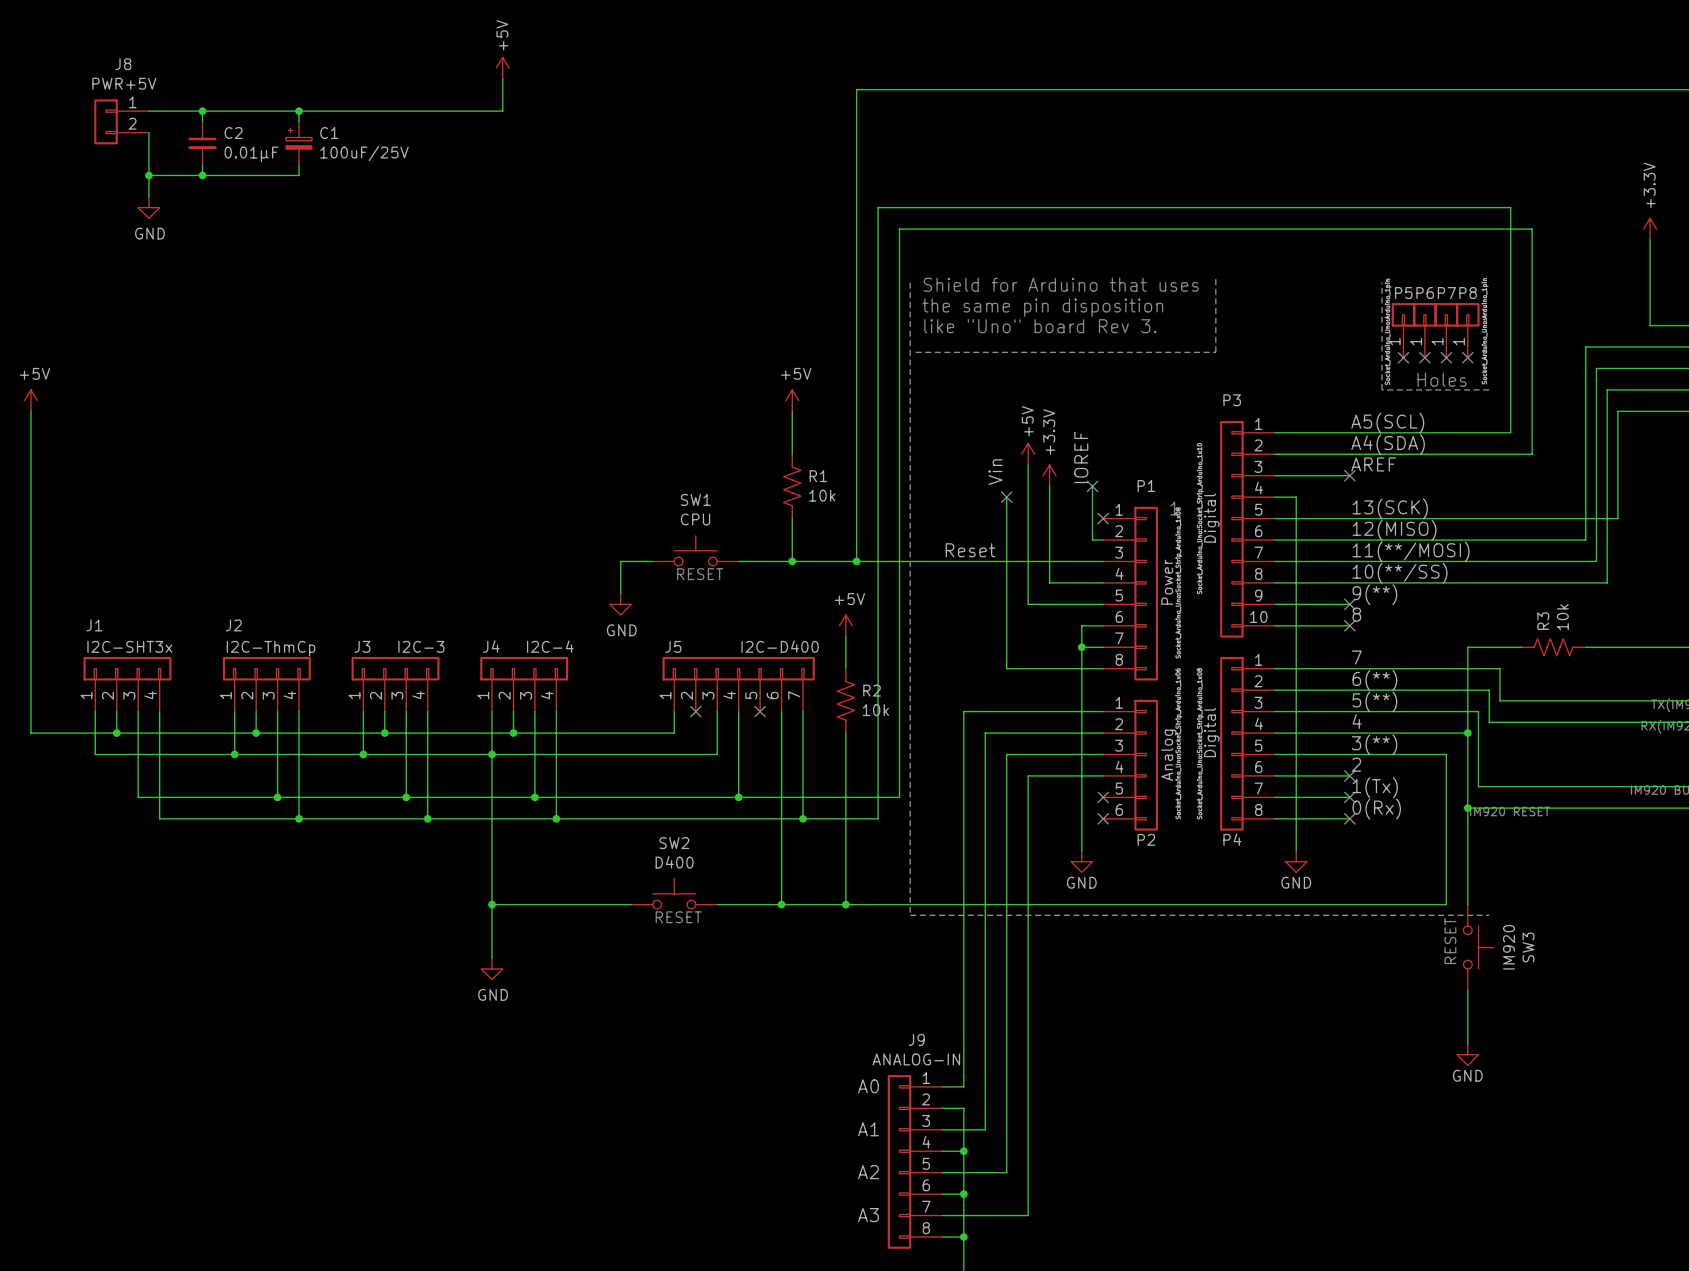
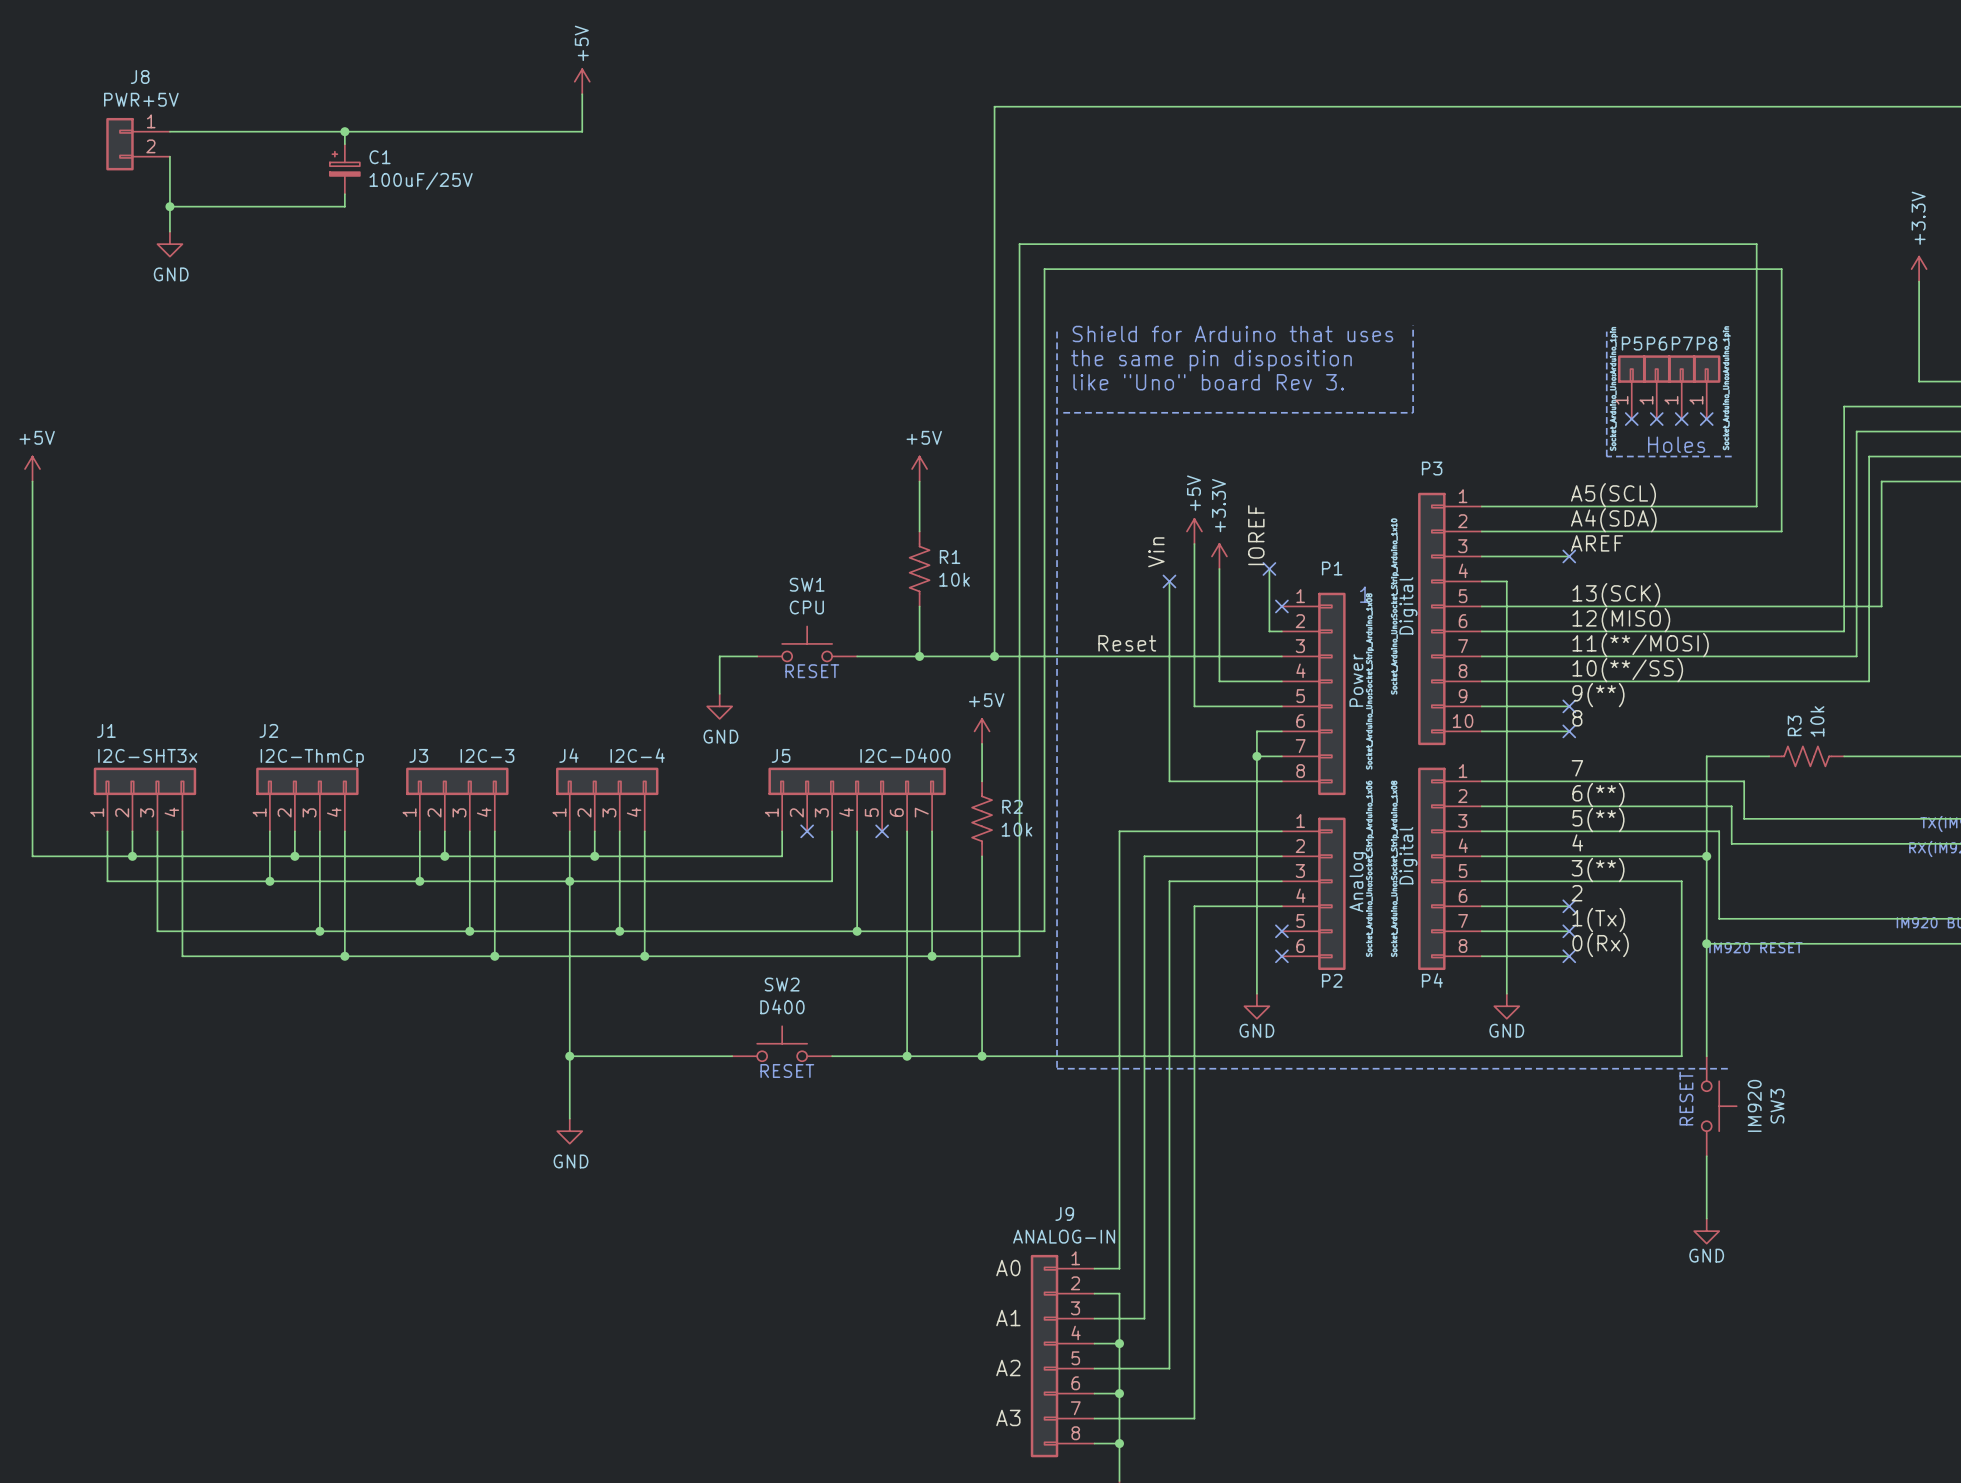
wire: (202, 111) (202, 121) -> none
junction: (202, 111) -> none
C2: 0.01μF (202, 143) -> none
wire: (202, 164) (202, 175) -> none
junction: (202, 175) -> none

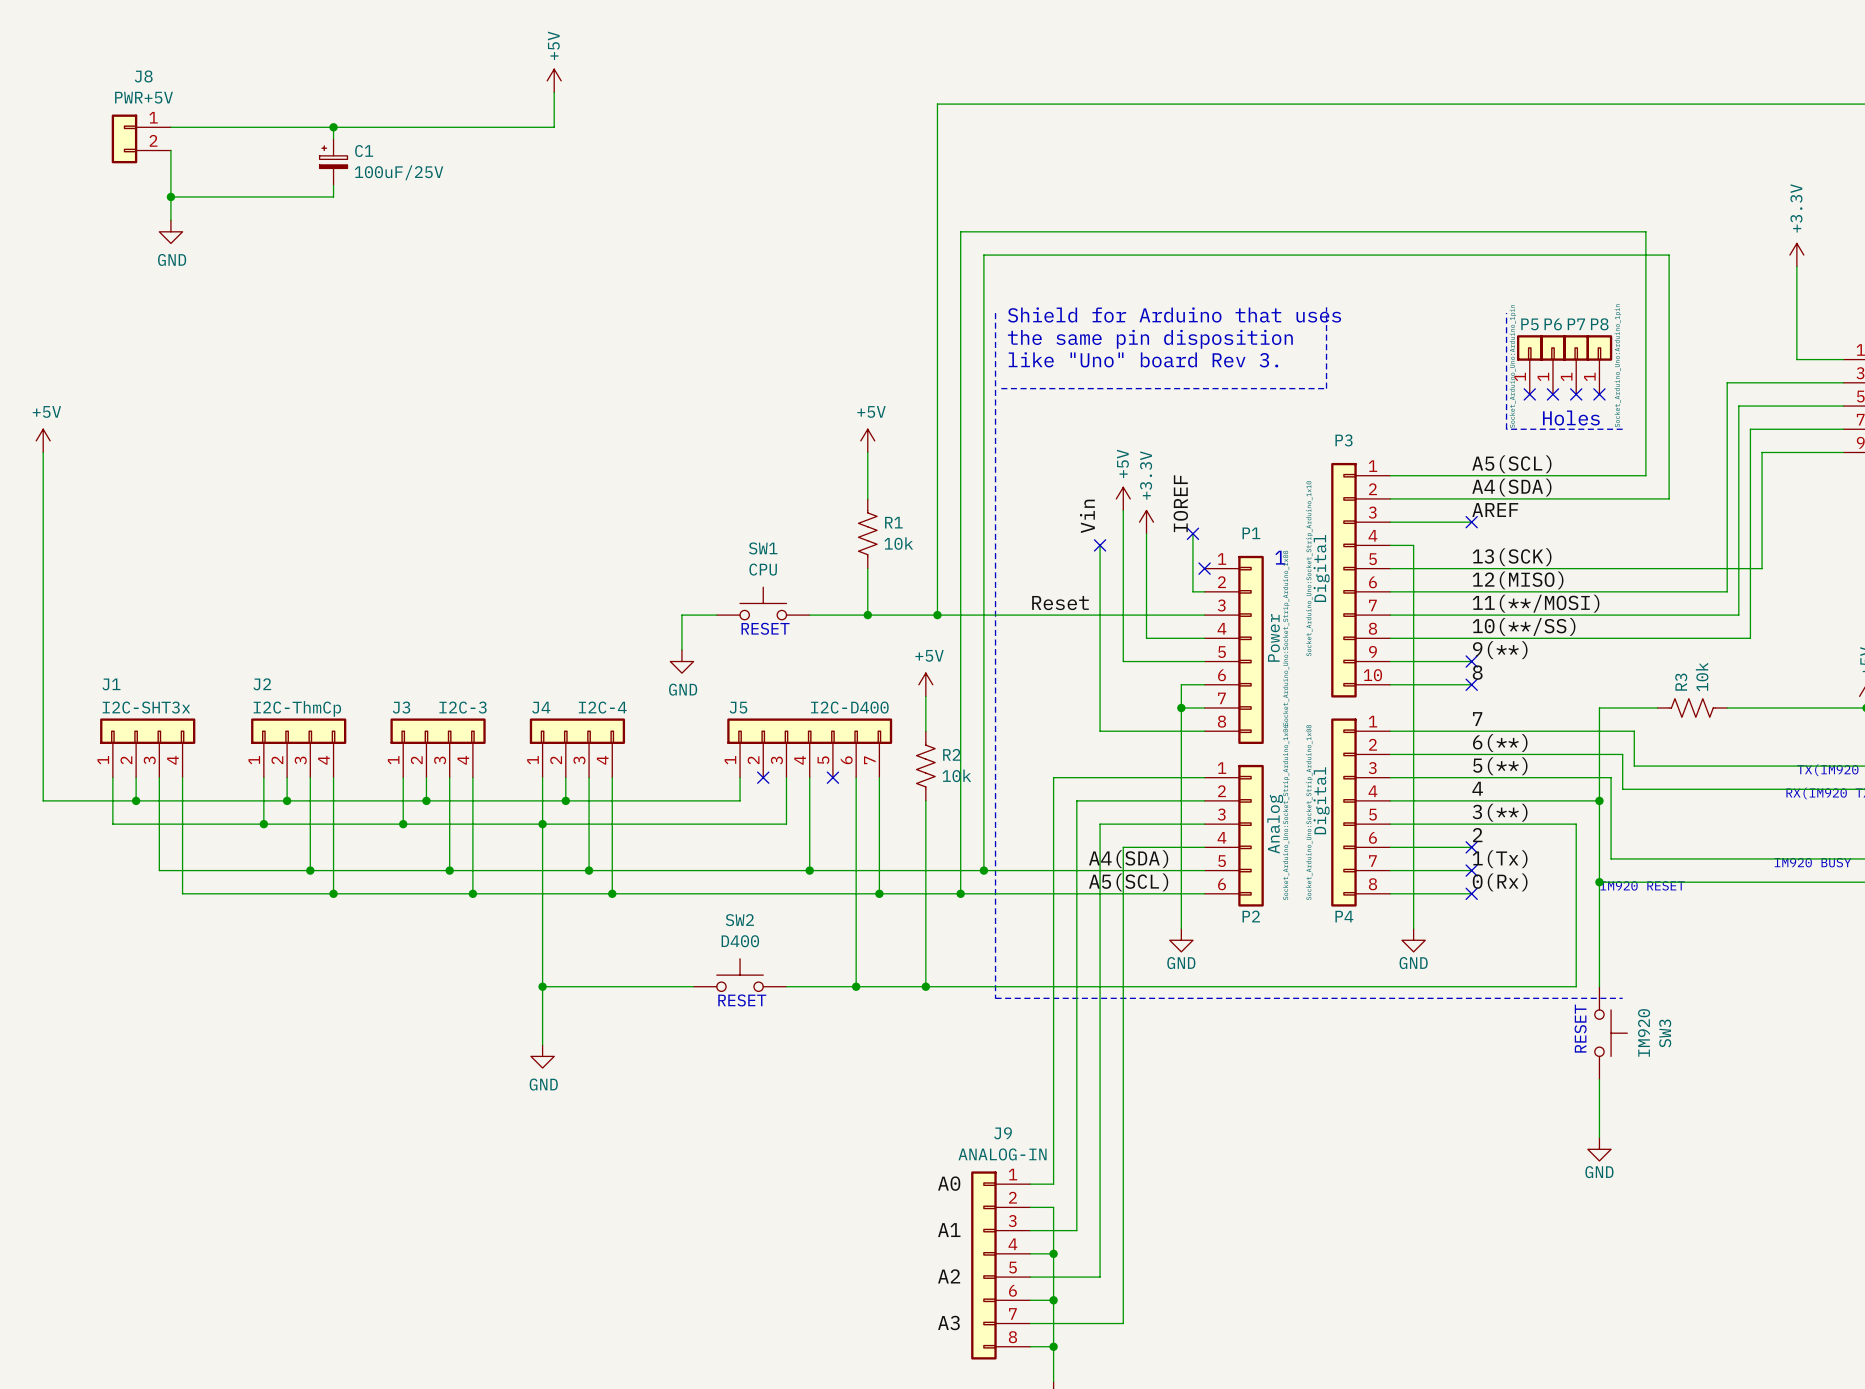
label: none -> A4(SDA) (1128, 859)
wire: none -> (983, 870) (1204, 870)
junction: none -> (983, 870)
no-connect mark: (1281, 931) -> none
label: none -> A5(SCL) (1128, 882)
wire: none -> (960, 893) (1204, 893)
junction: none -> (960, 893)
no-connect mark: (1281, 956) -> none

